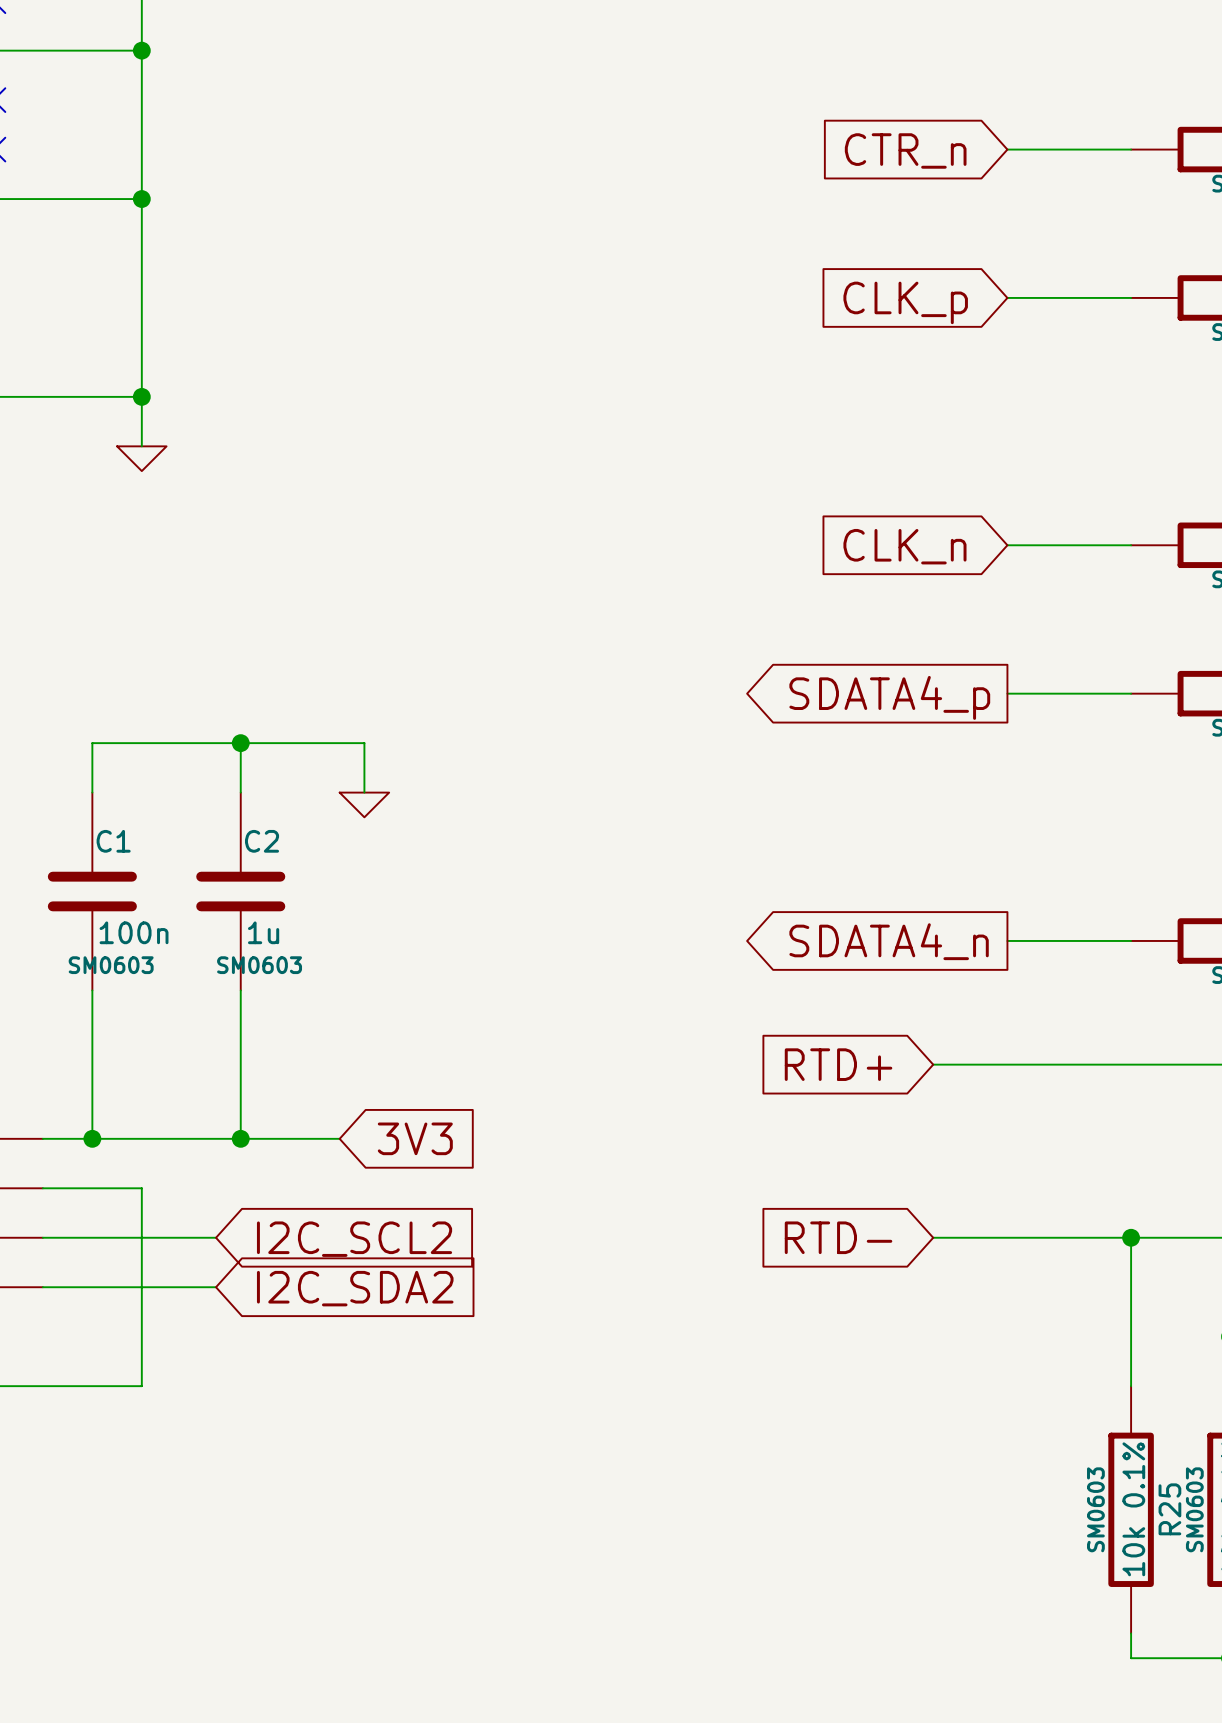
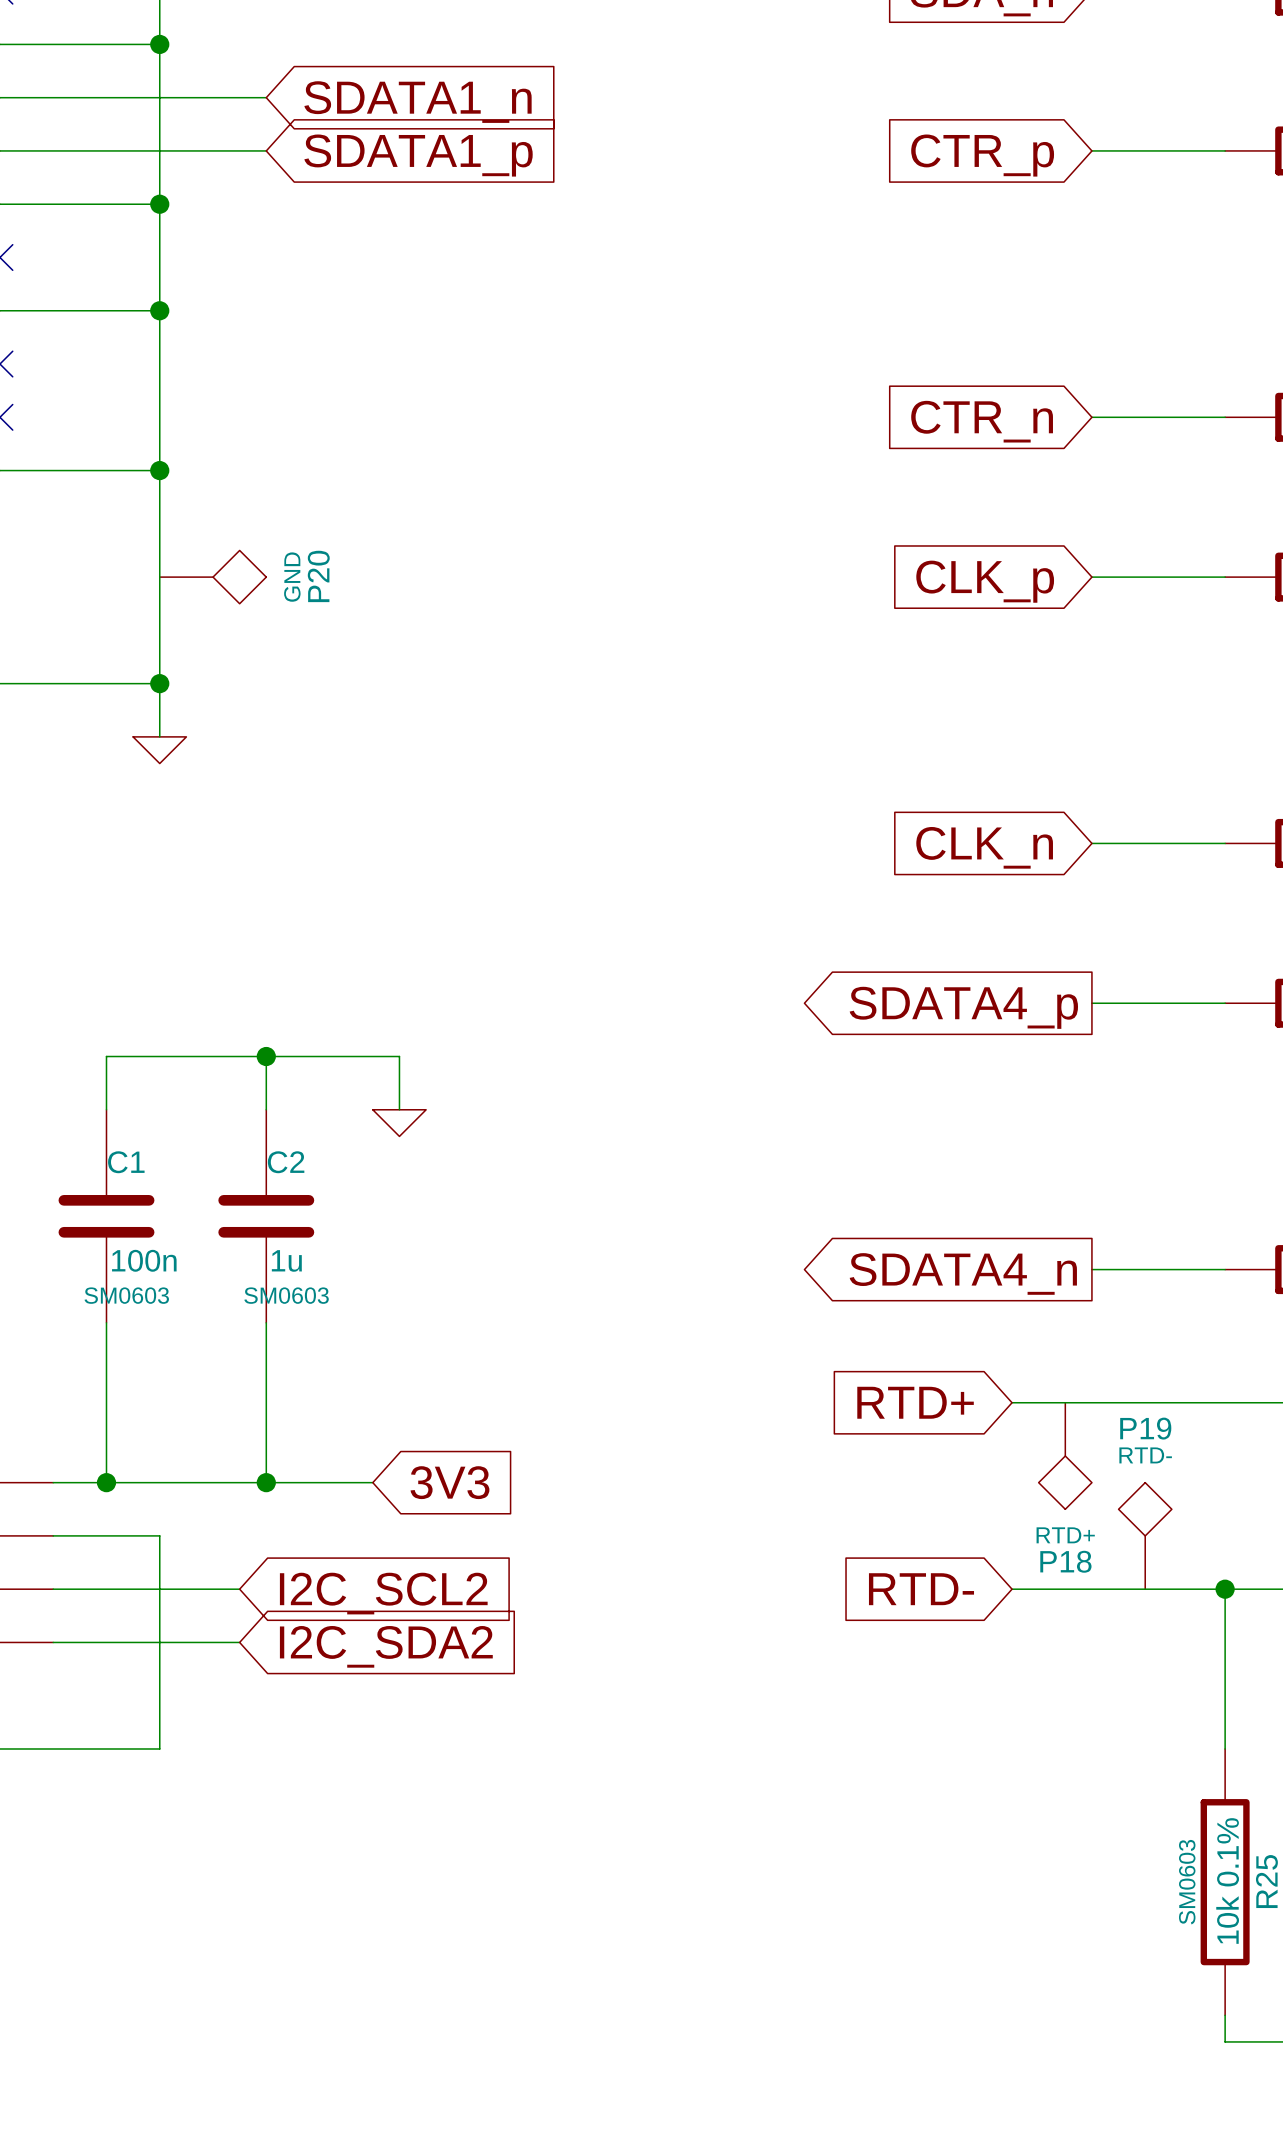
P20: none -> GND (213, 577)
P18: none -> RTD+ (1065, 1456)
P19: none -> RTD- (1145, 1535)

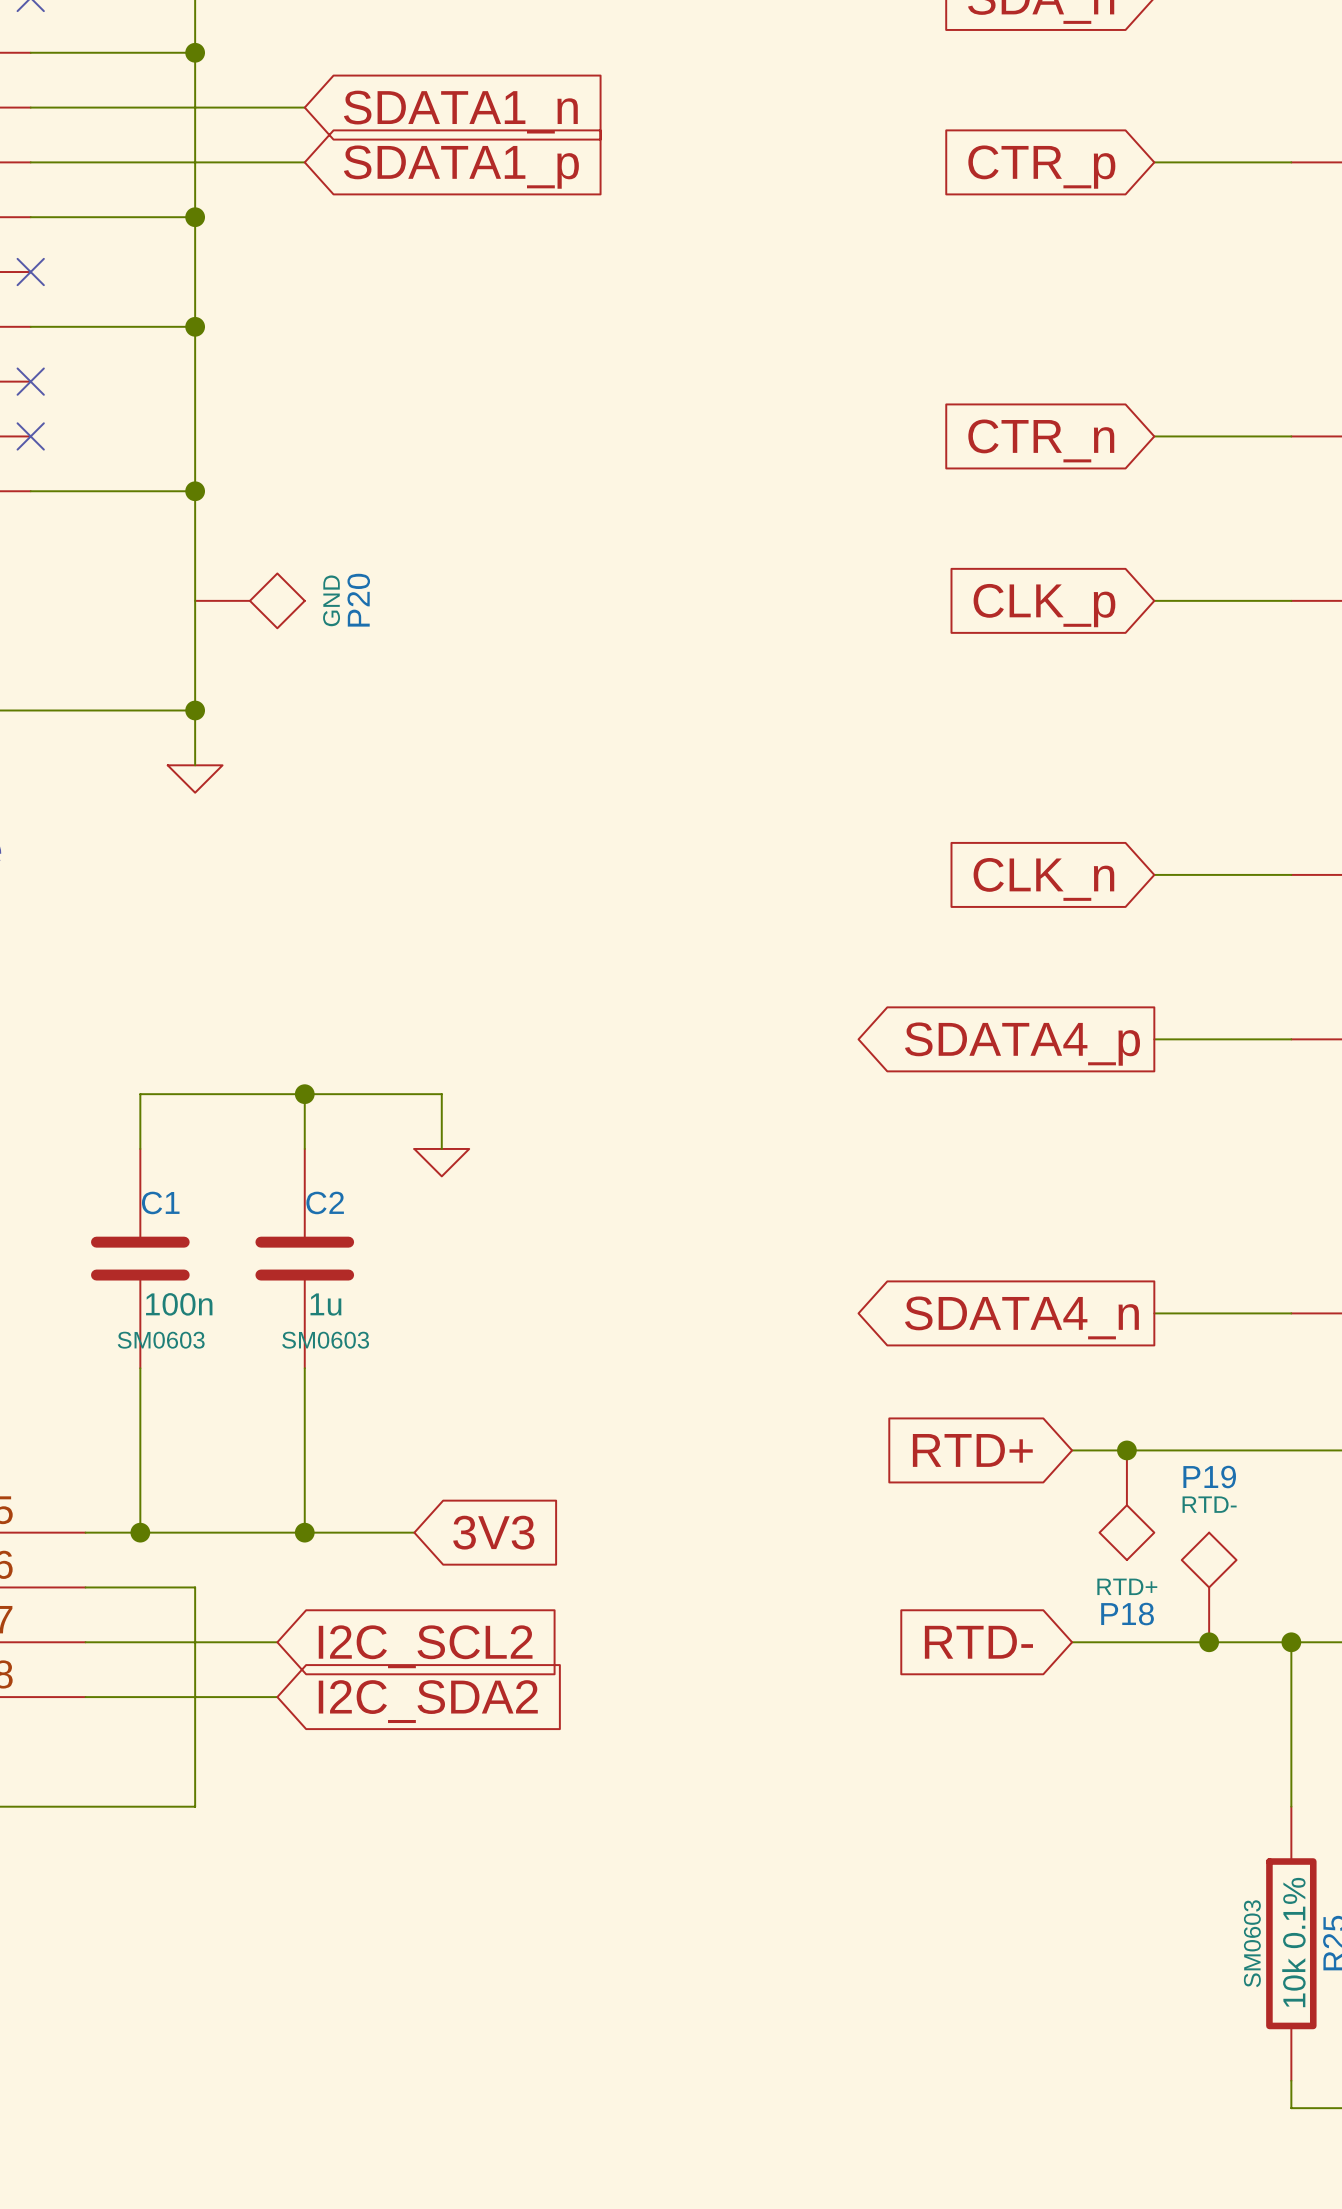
junction: none -> (1126, 1450)
junction: none -> (1209, 1642)

